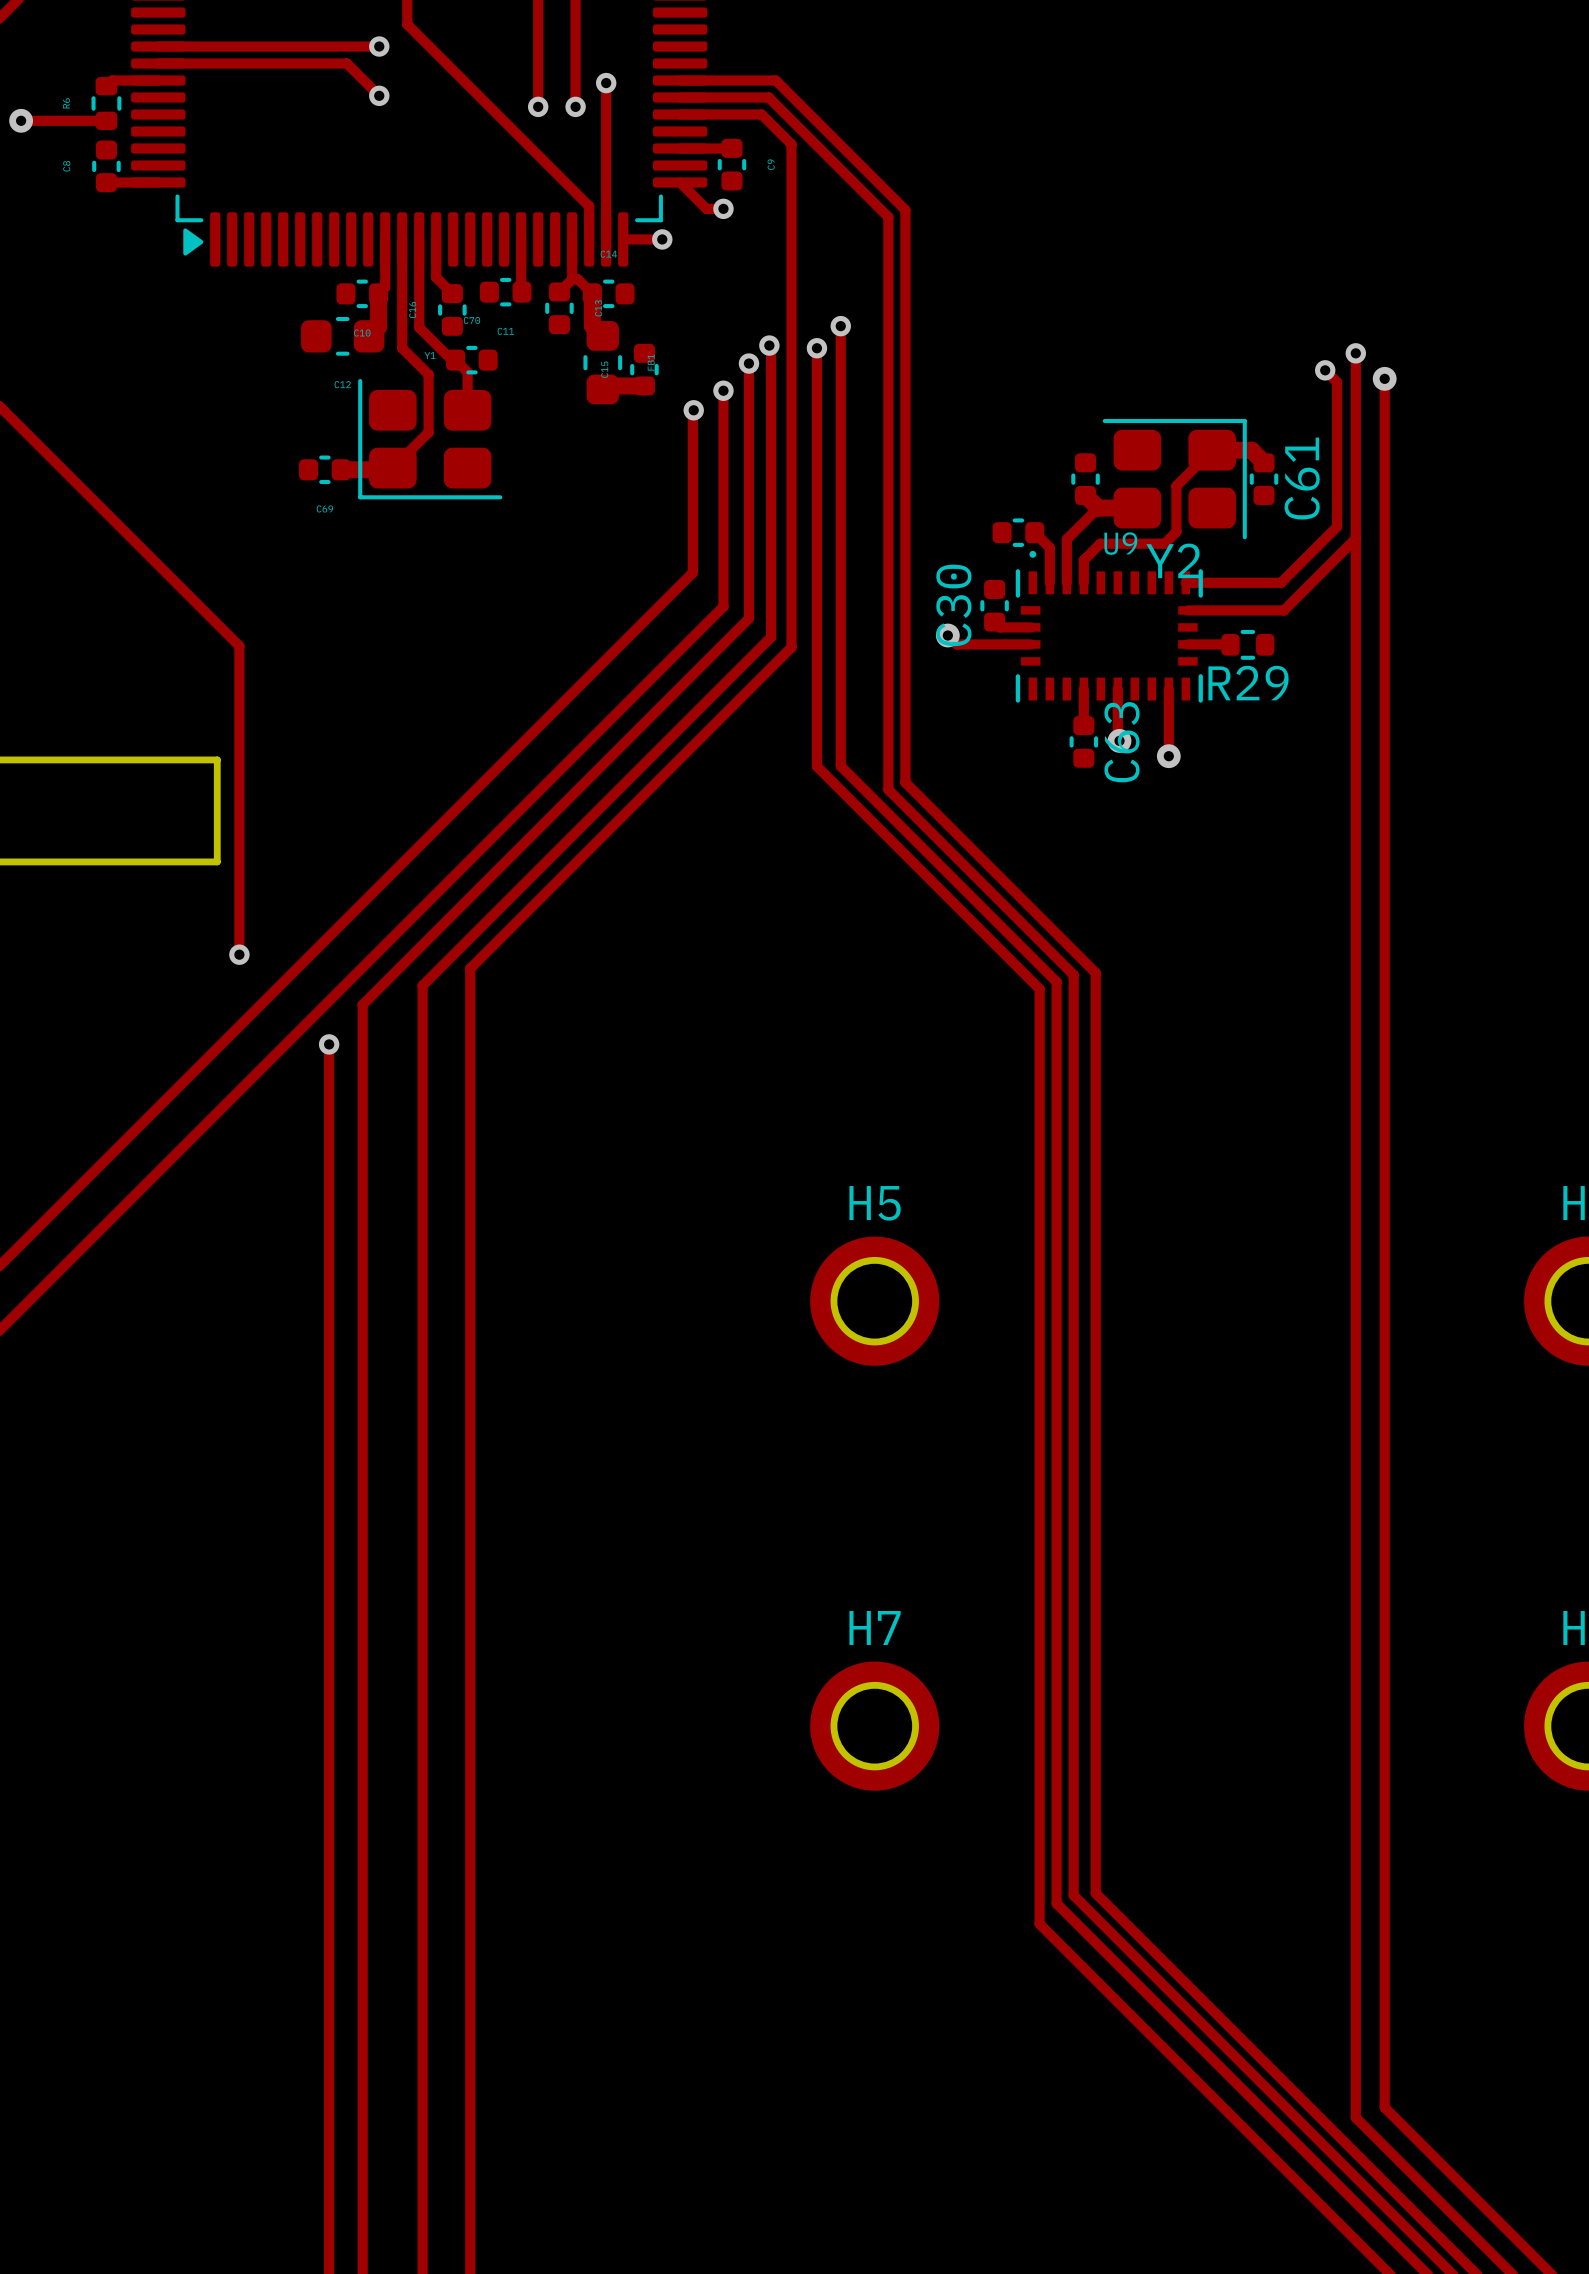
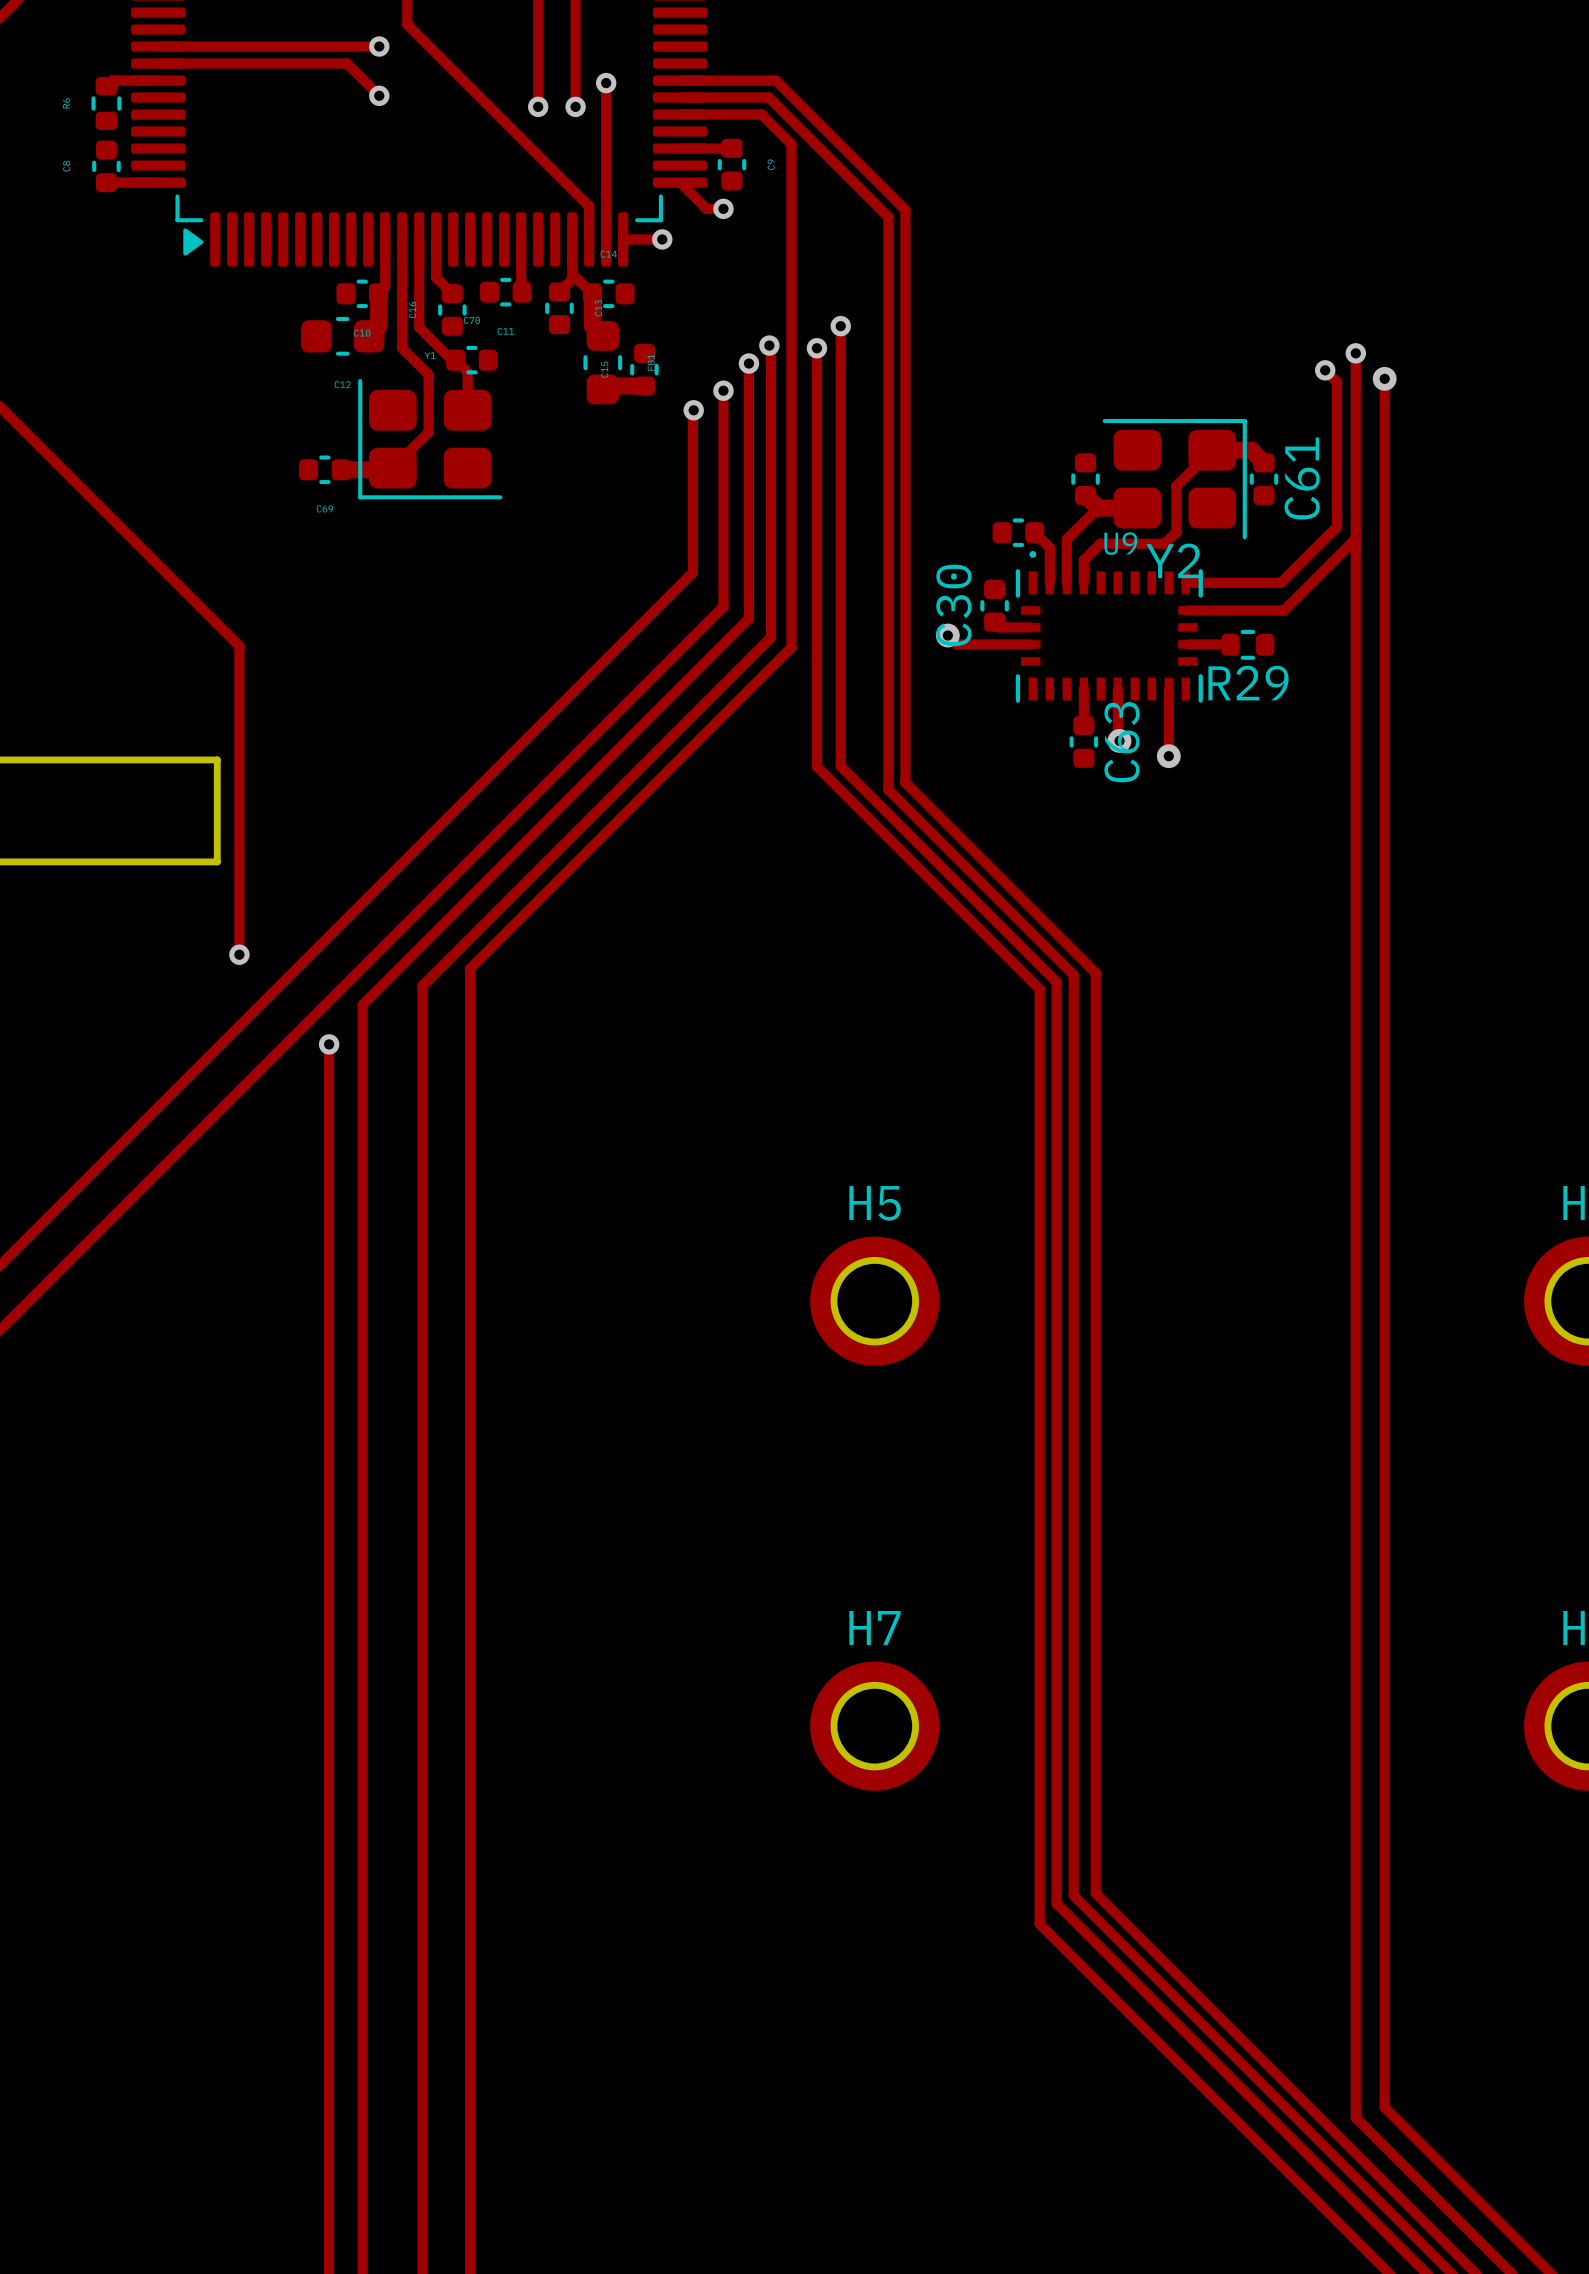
track: (21, 120) (106, 120) -> none
via: (21, 120) -> none

